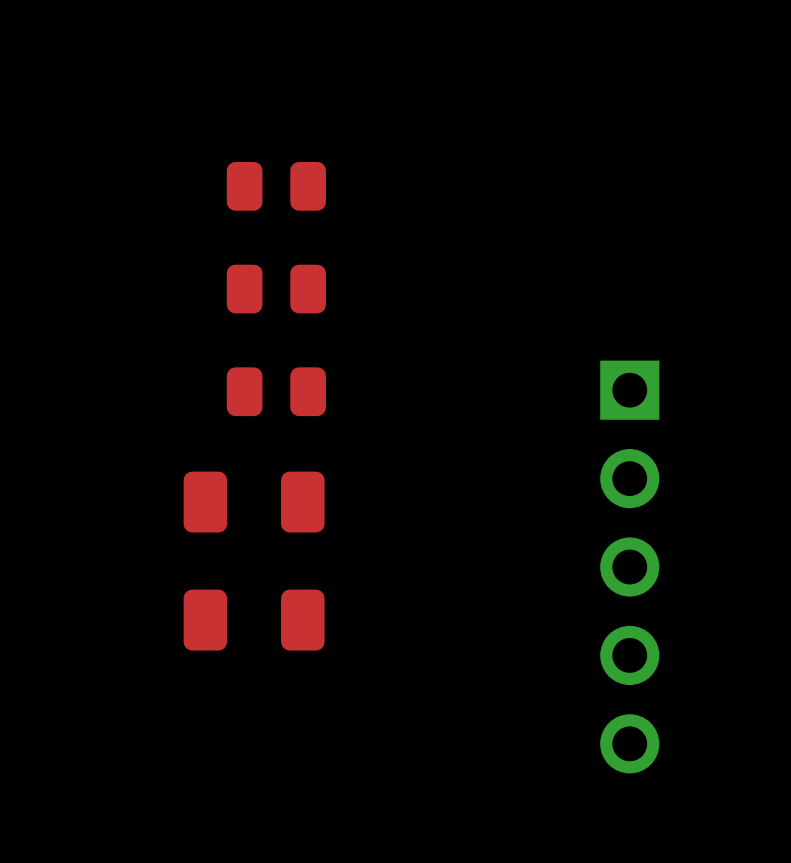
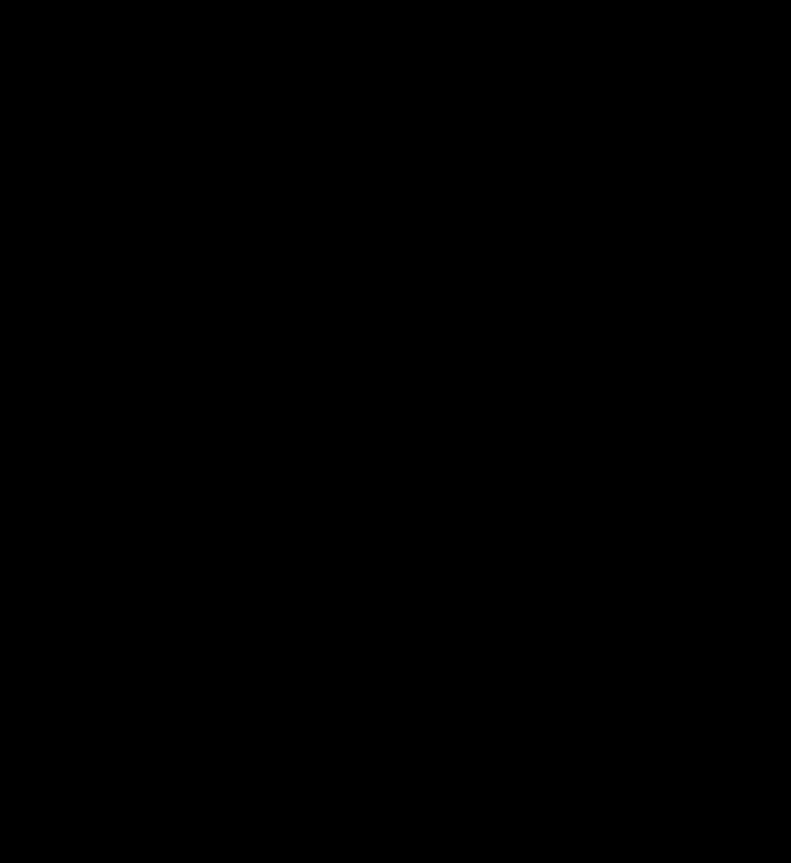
part: (276, 186) -> none
part: (276, 289) -> none
part: (276, 391) -> none
part: (254, 502) -> none
part: (629, 567) -> none
part: (254, 620) -> none

